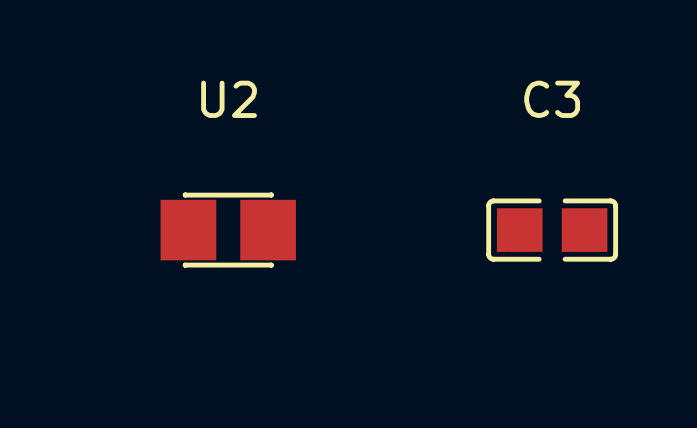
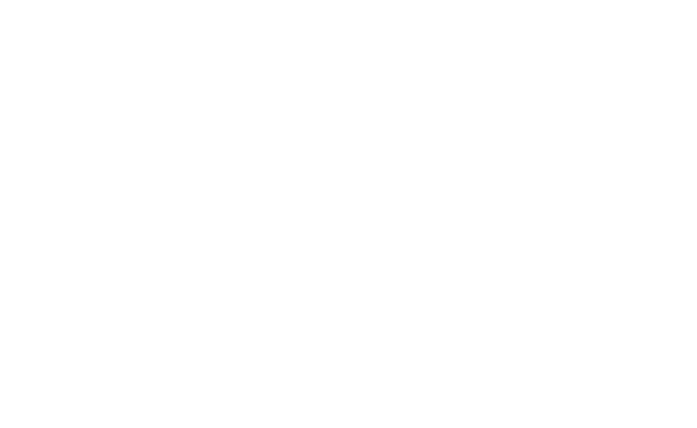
U2: (228, 230) -> none
C3: (552, 230) -> none

